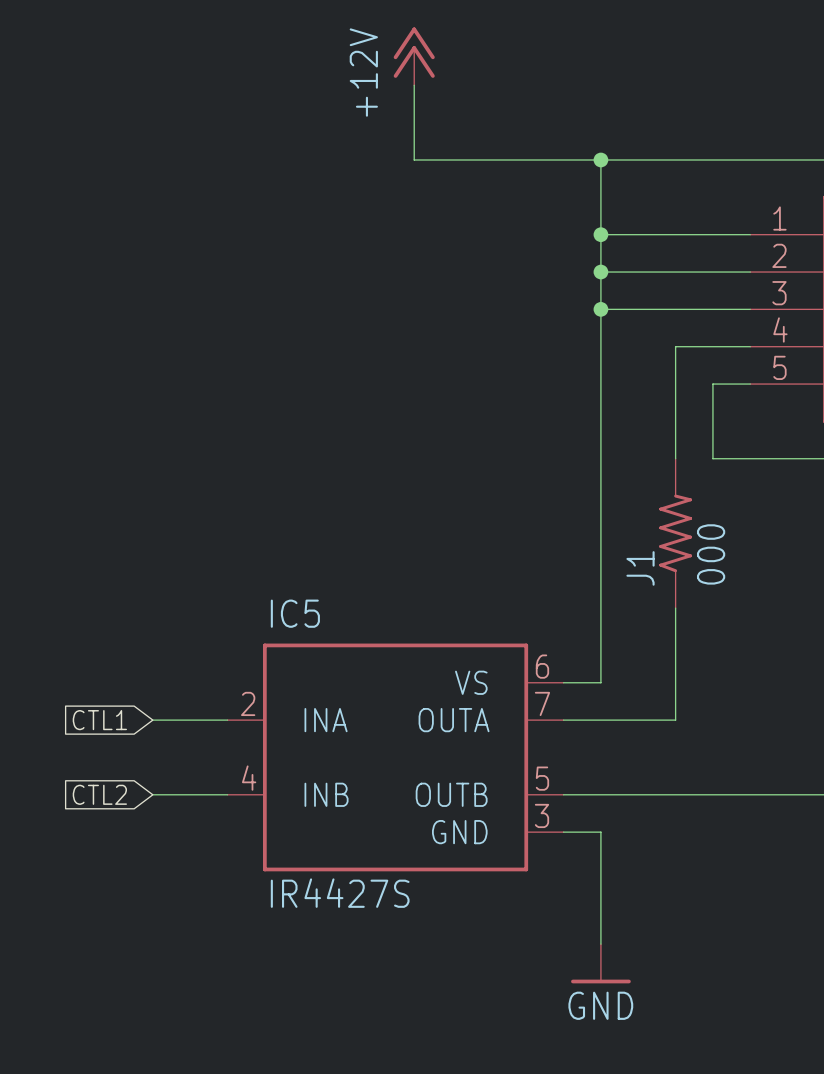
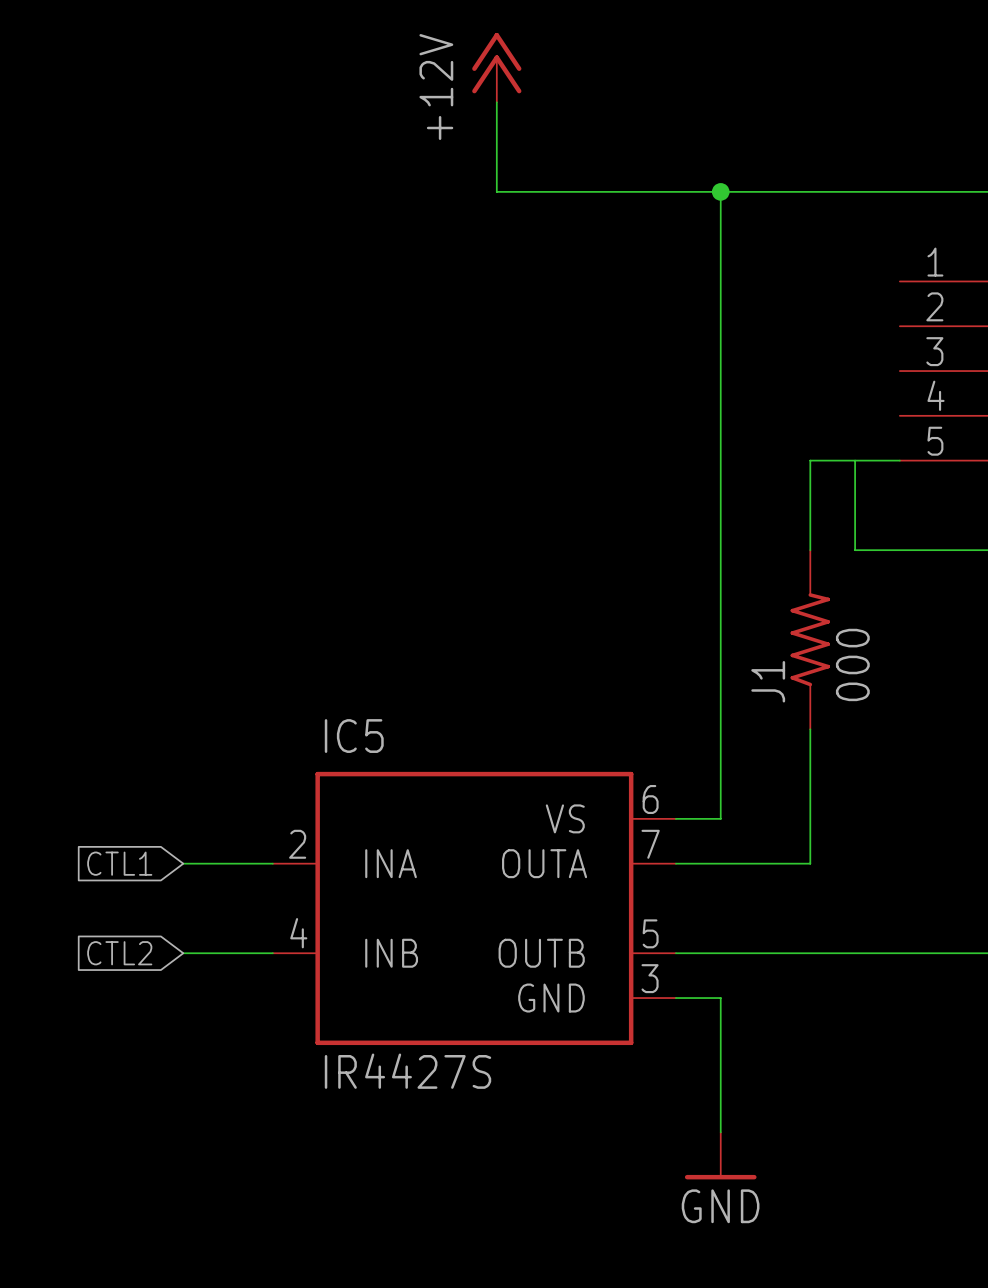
wire: (600, 234) (750, 234) -> none
junction: (600, 234) -> none
wire: (600, 272) (750, 272) -> none
junction: (600, 272) -> none
wire: (600, 309) (750, 309) -> none
junction: (600, 309) -> none
wire: (750, 346) (675, 346) (675, 384) -> (855, 460) (810, 460)

